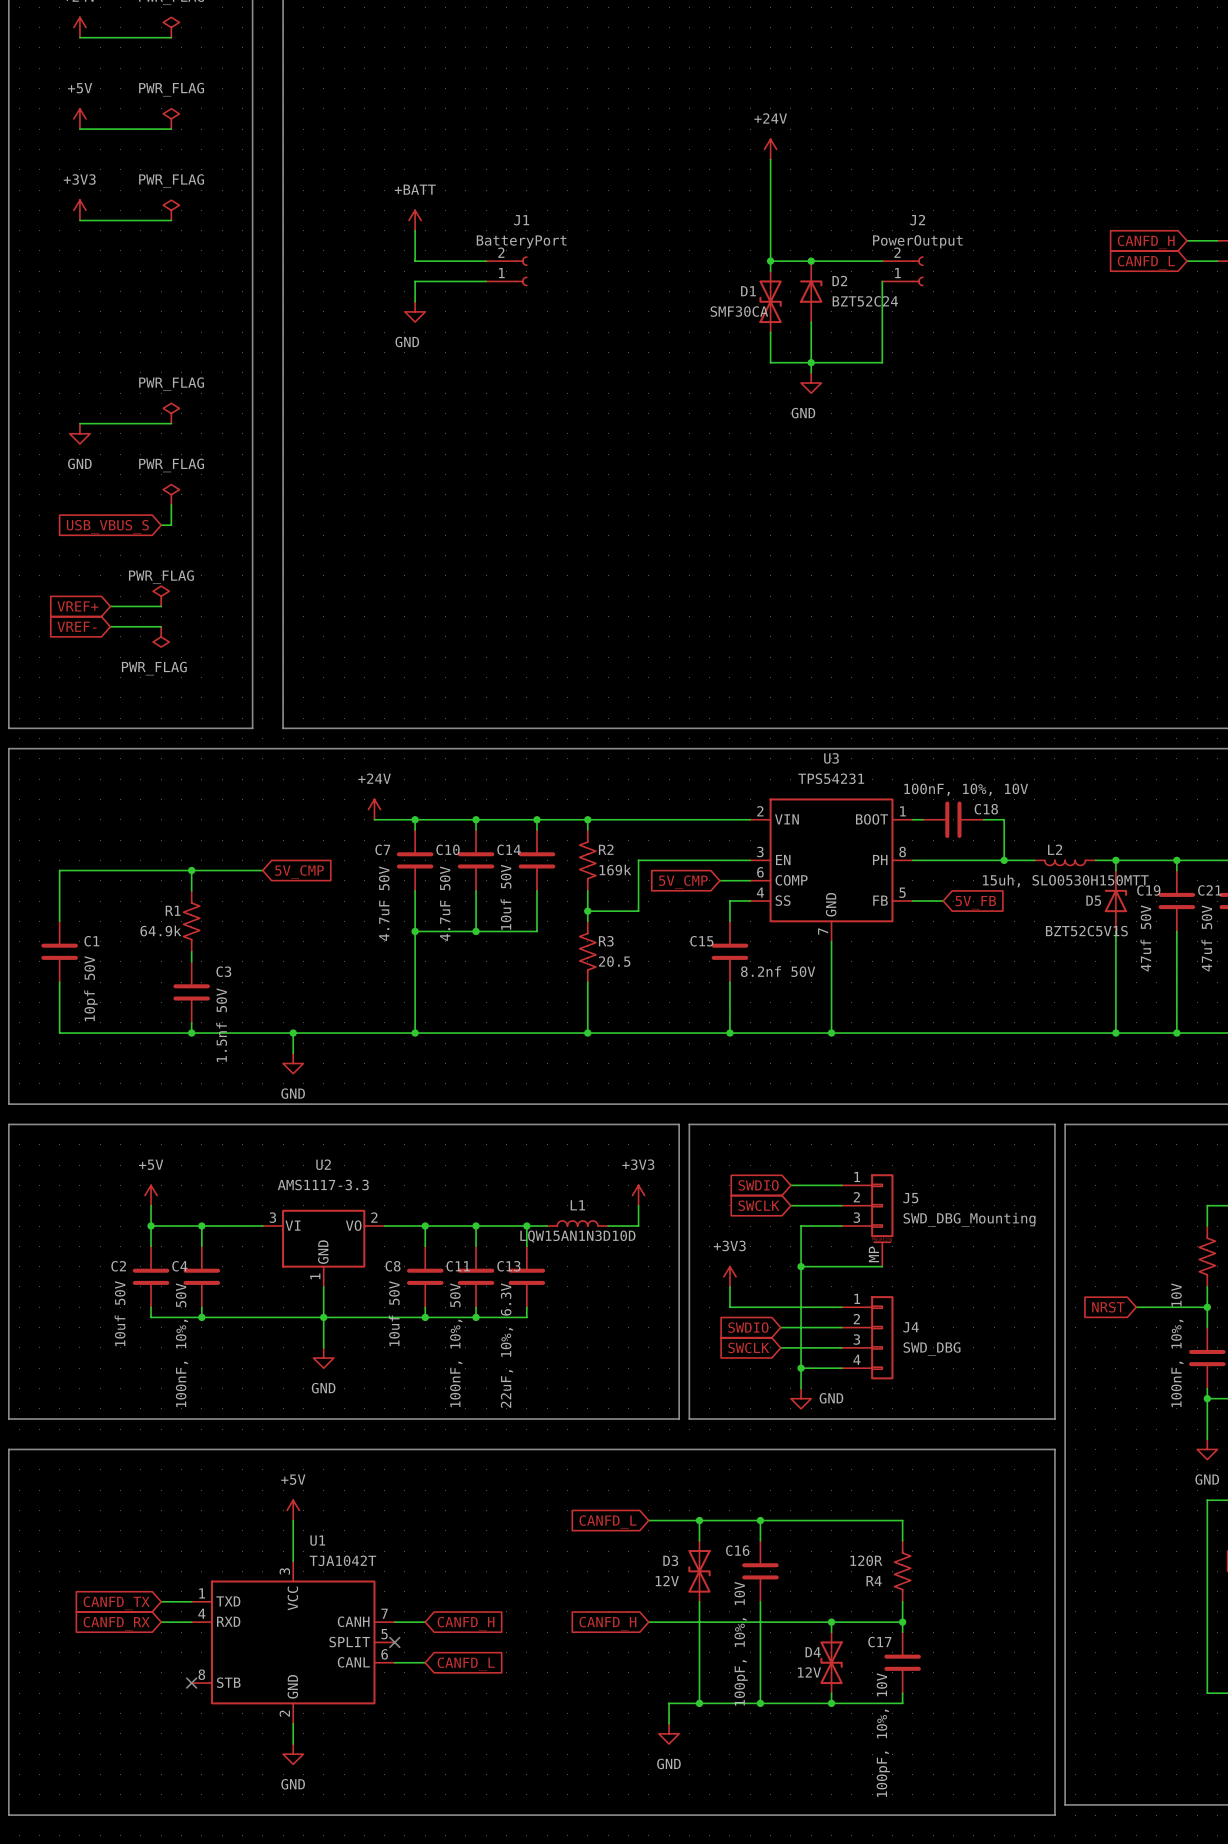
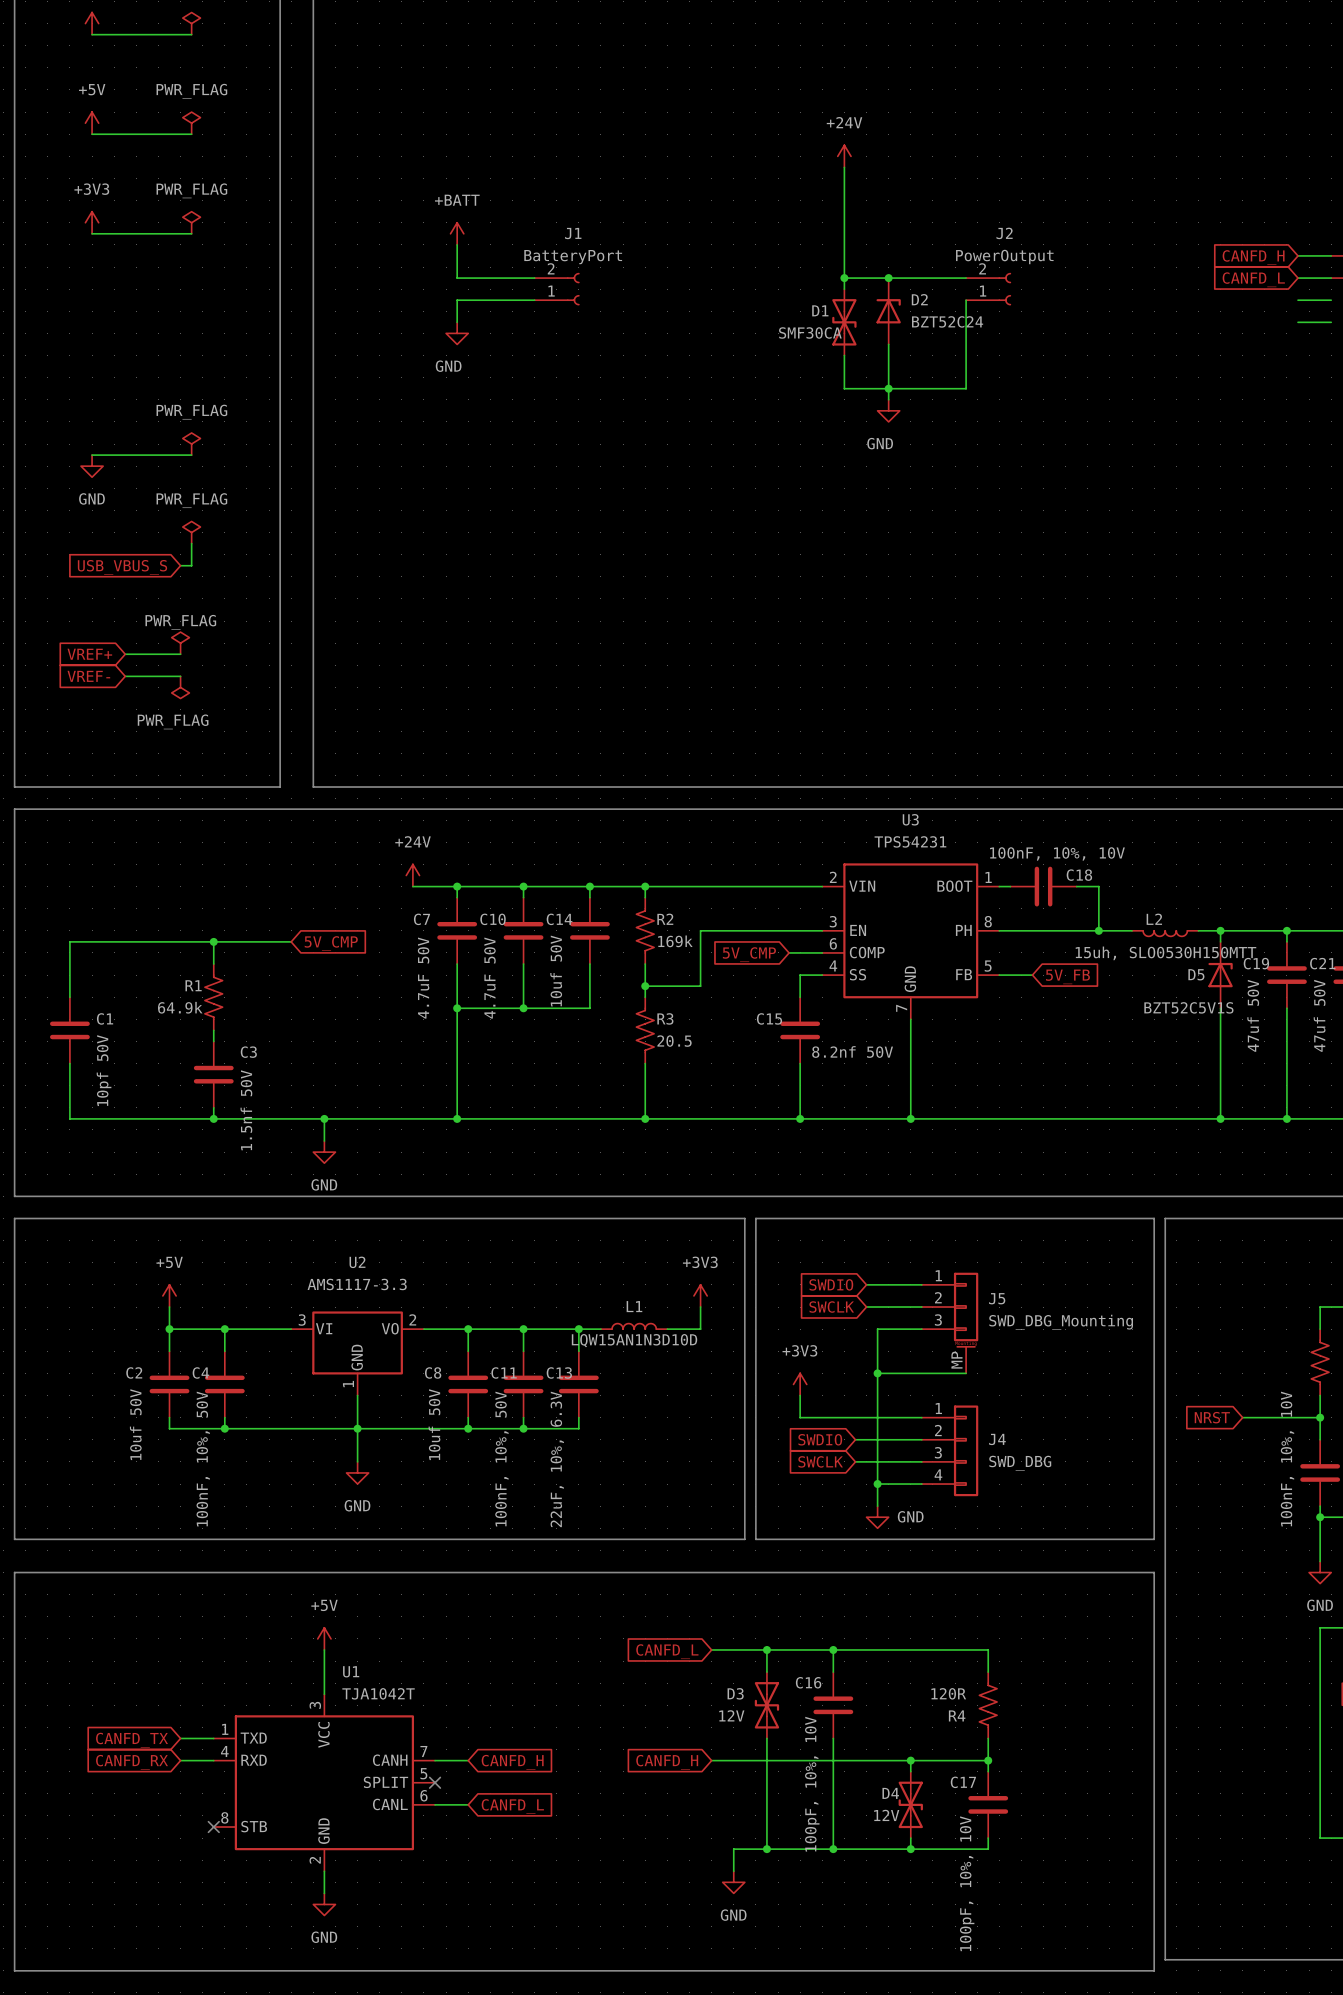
wire: none -> (1298, 300) (1331, 300)
wire: none -> (1298, 322) (1331, 322)

